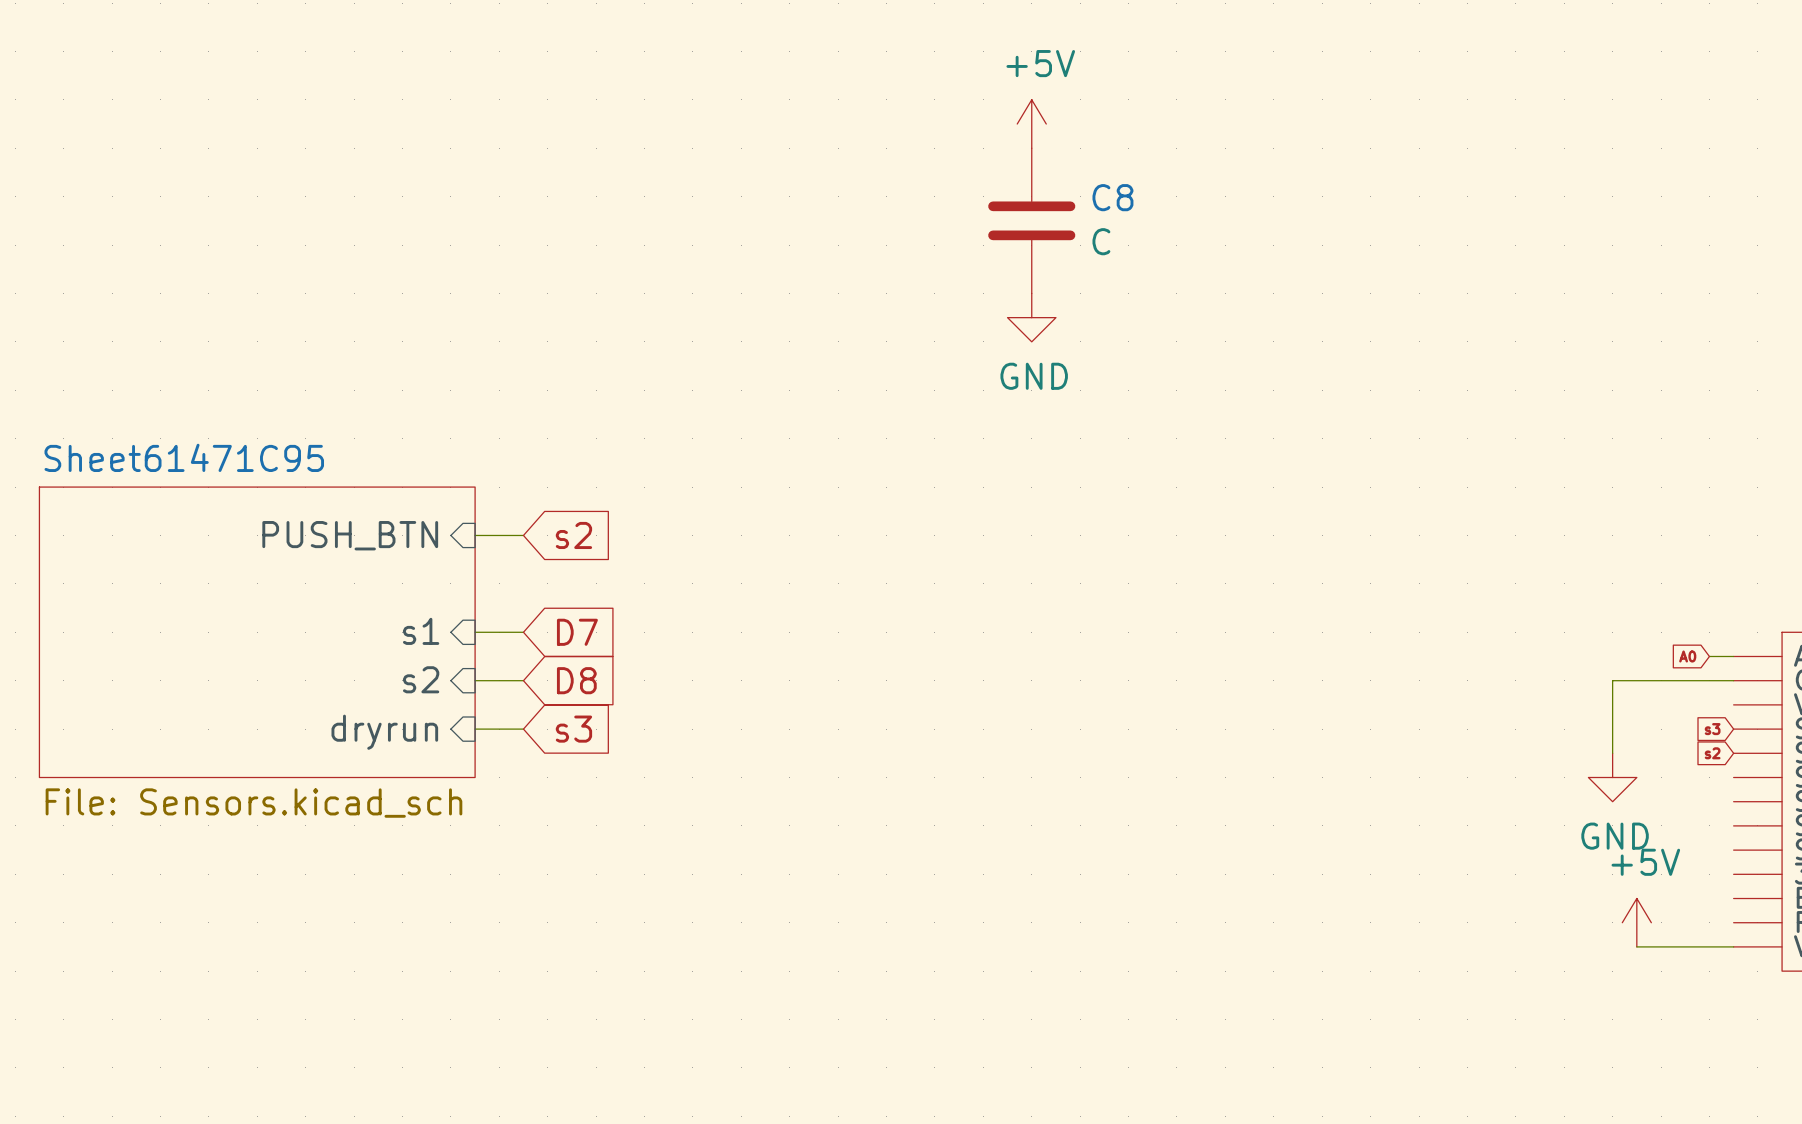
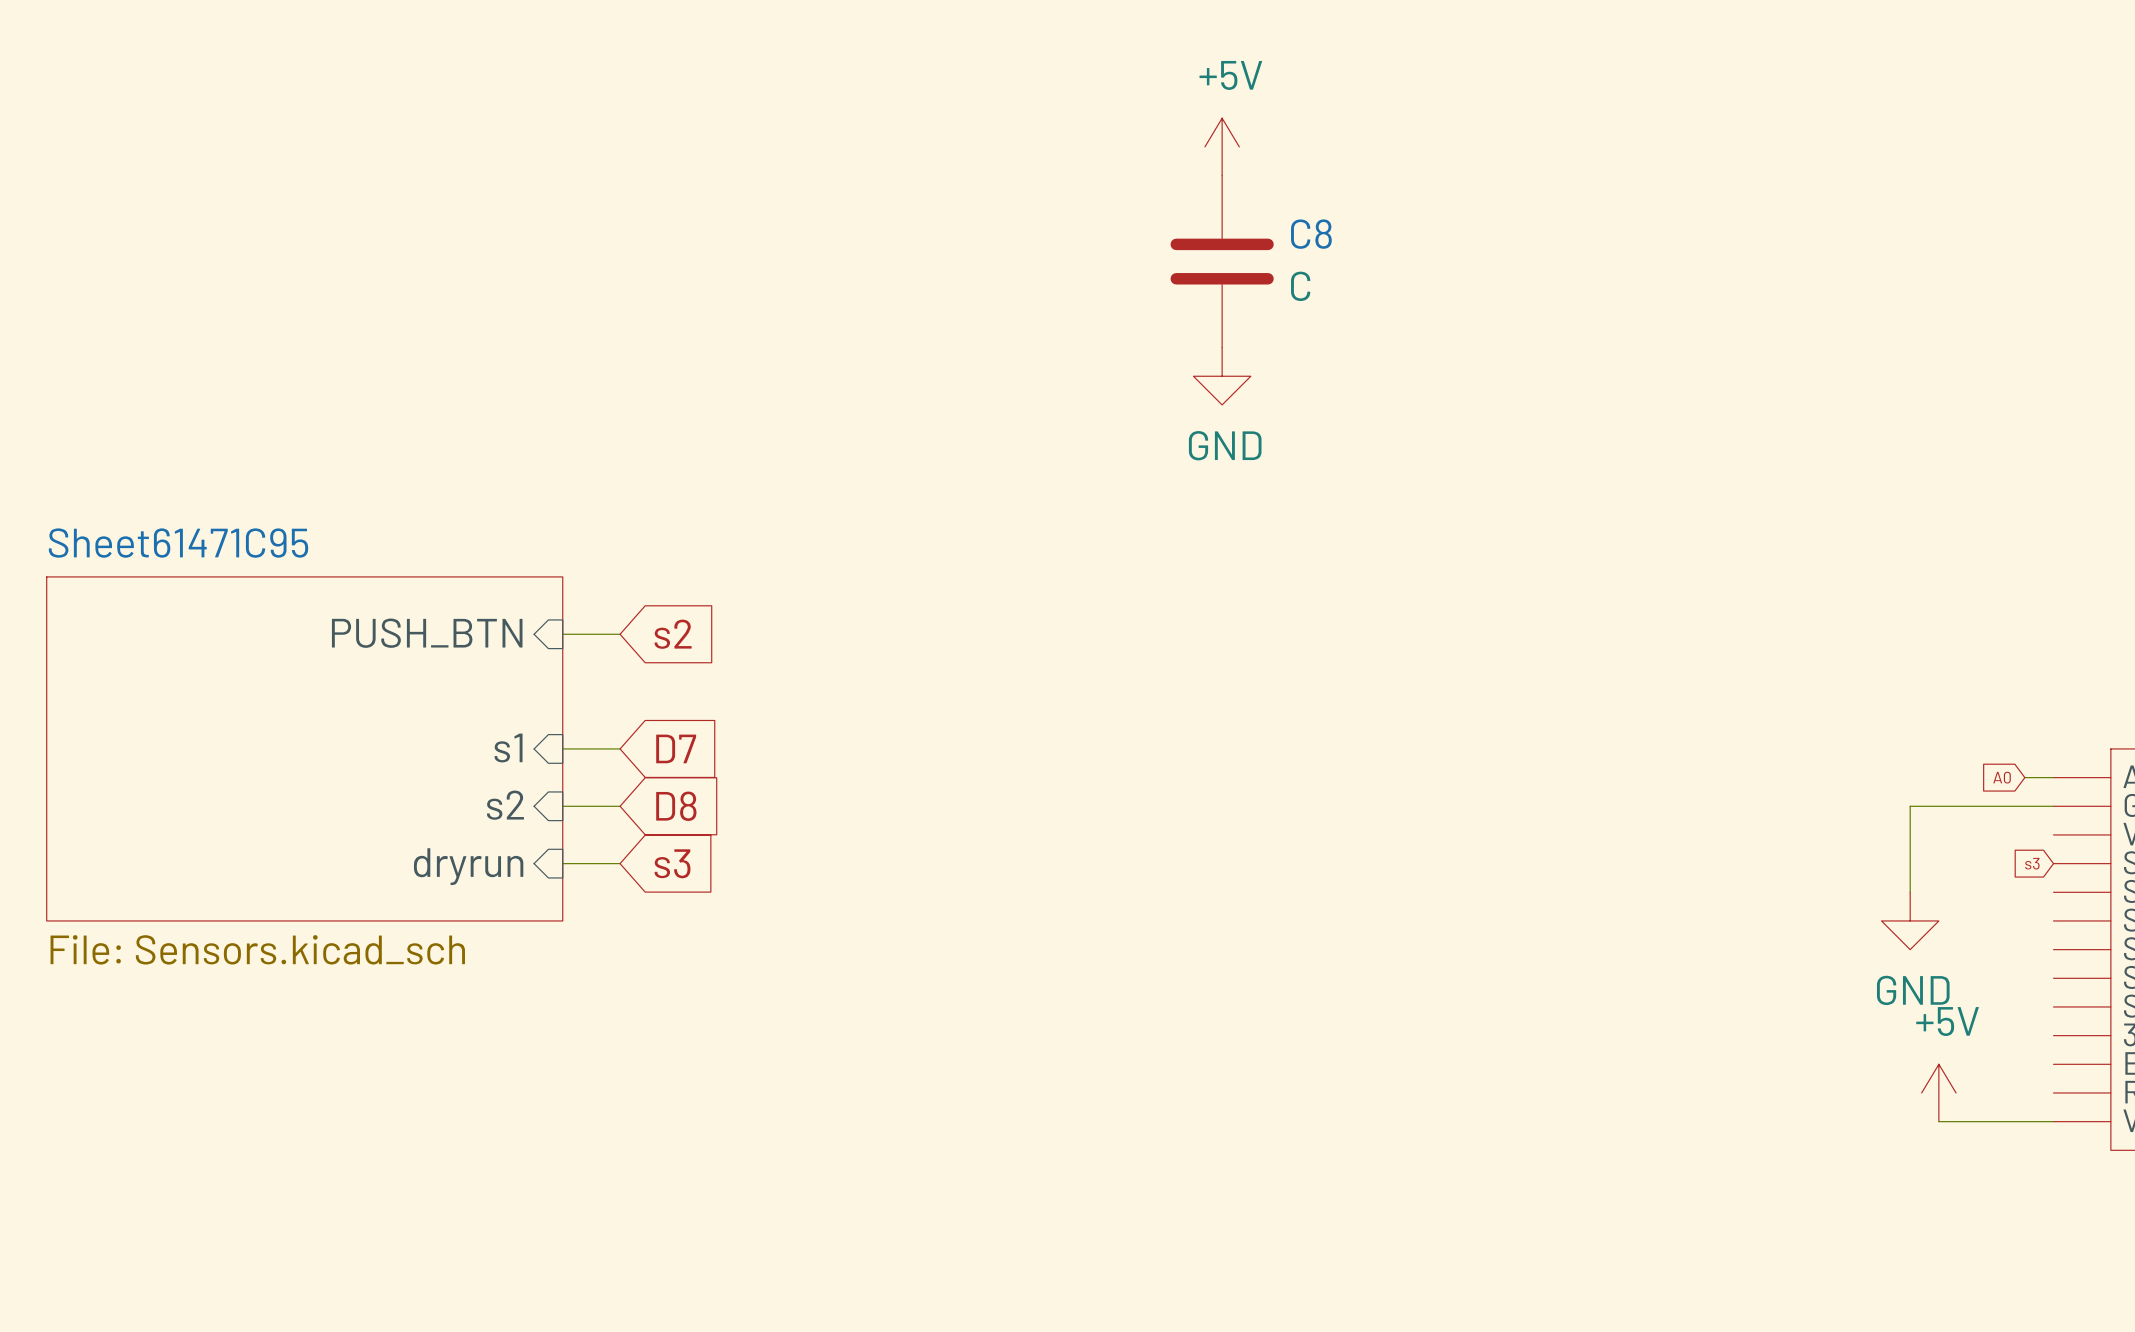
global label: s2 (1712, 753) -> none

